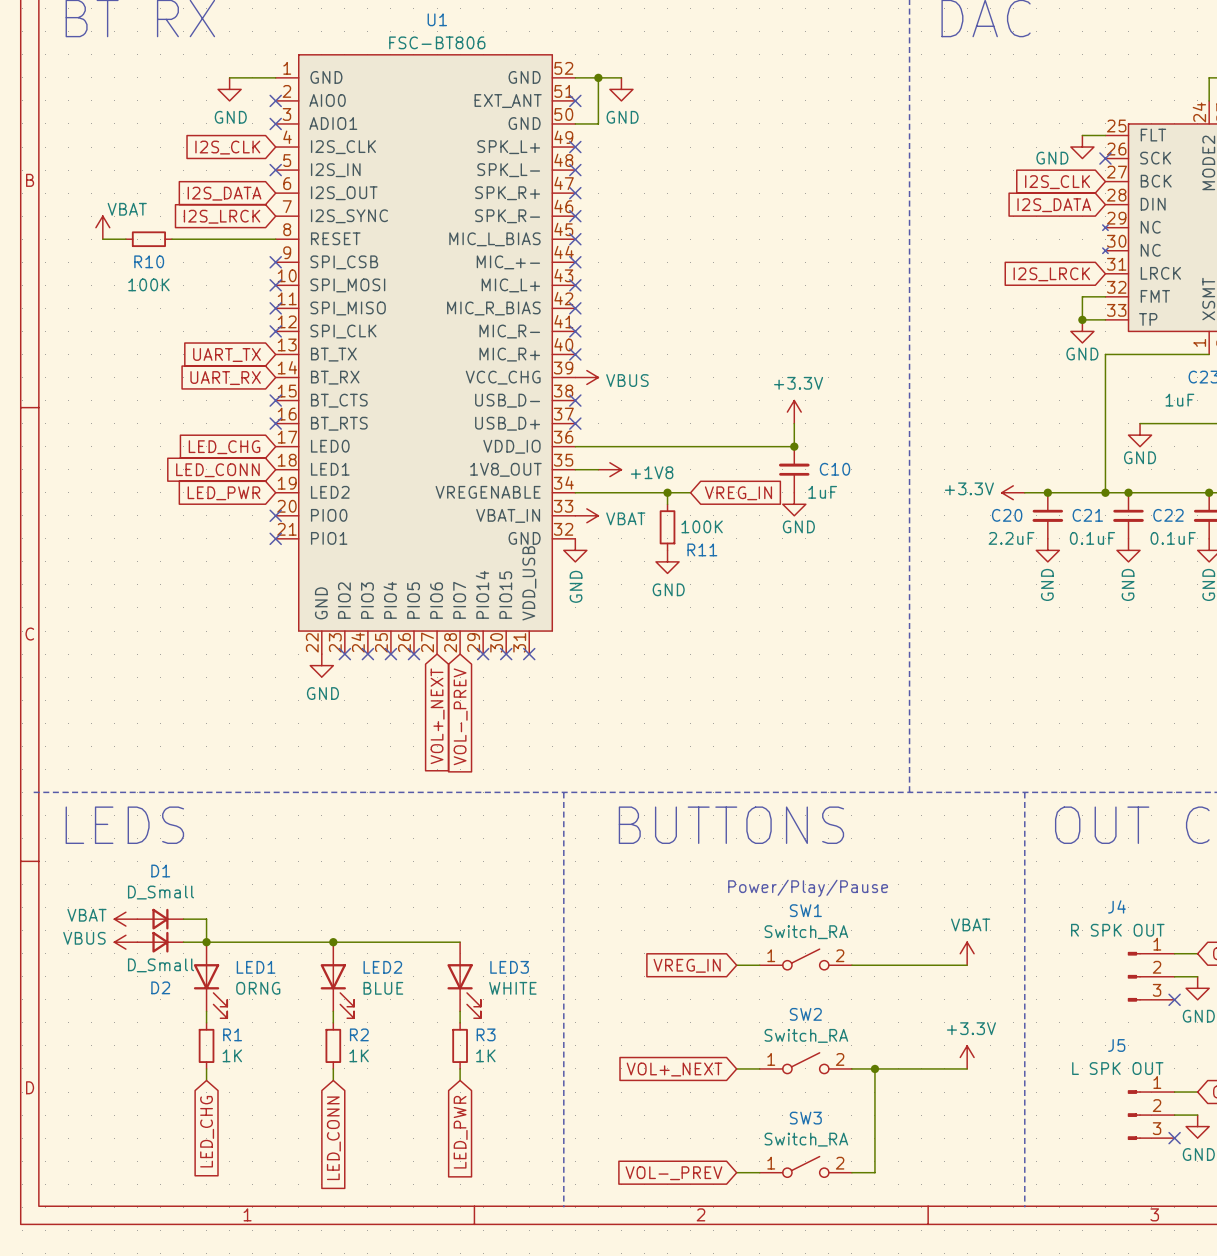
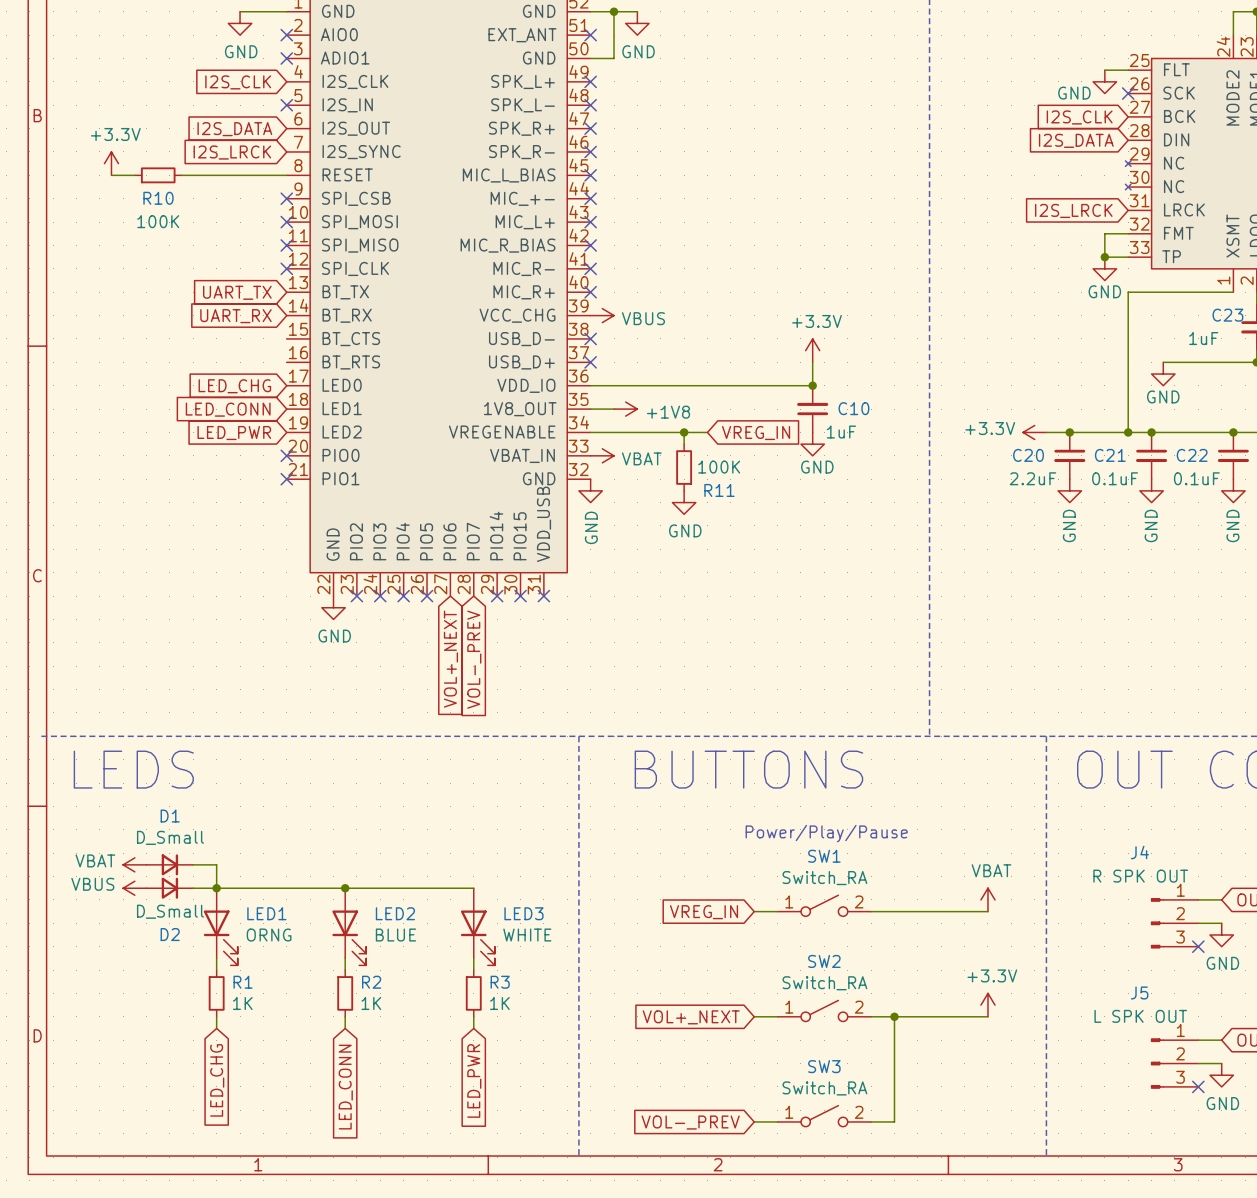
power symbol: VBAT (102, 227) -> +3.3V (111, 163)
no-connect mark: (275, 400) -> none
no-connect mark: (275, 423) -> none

